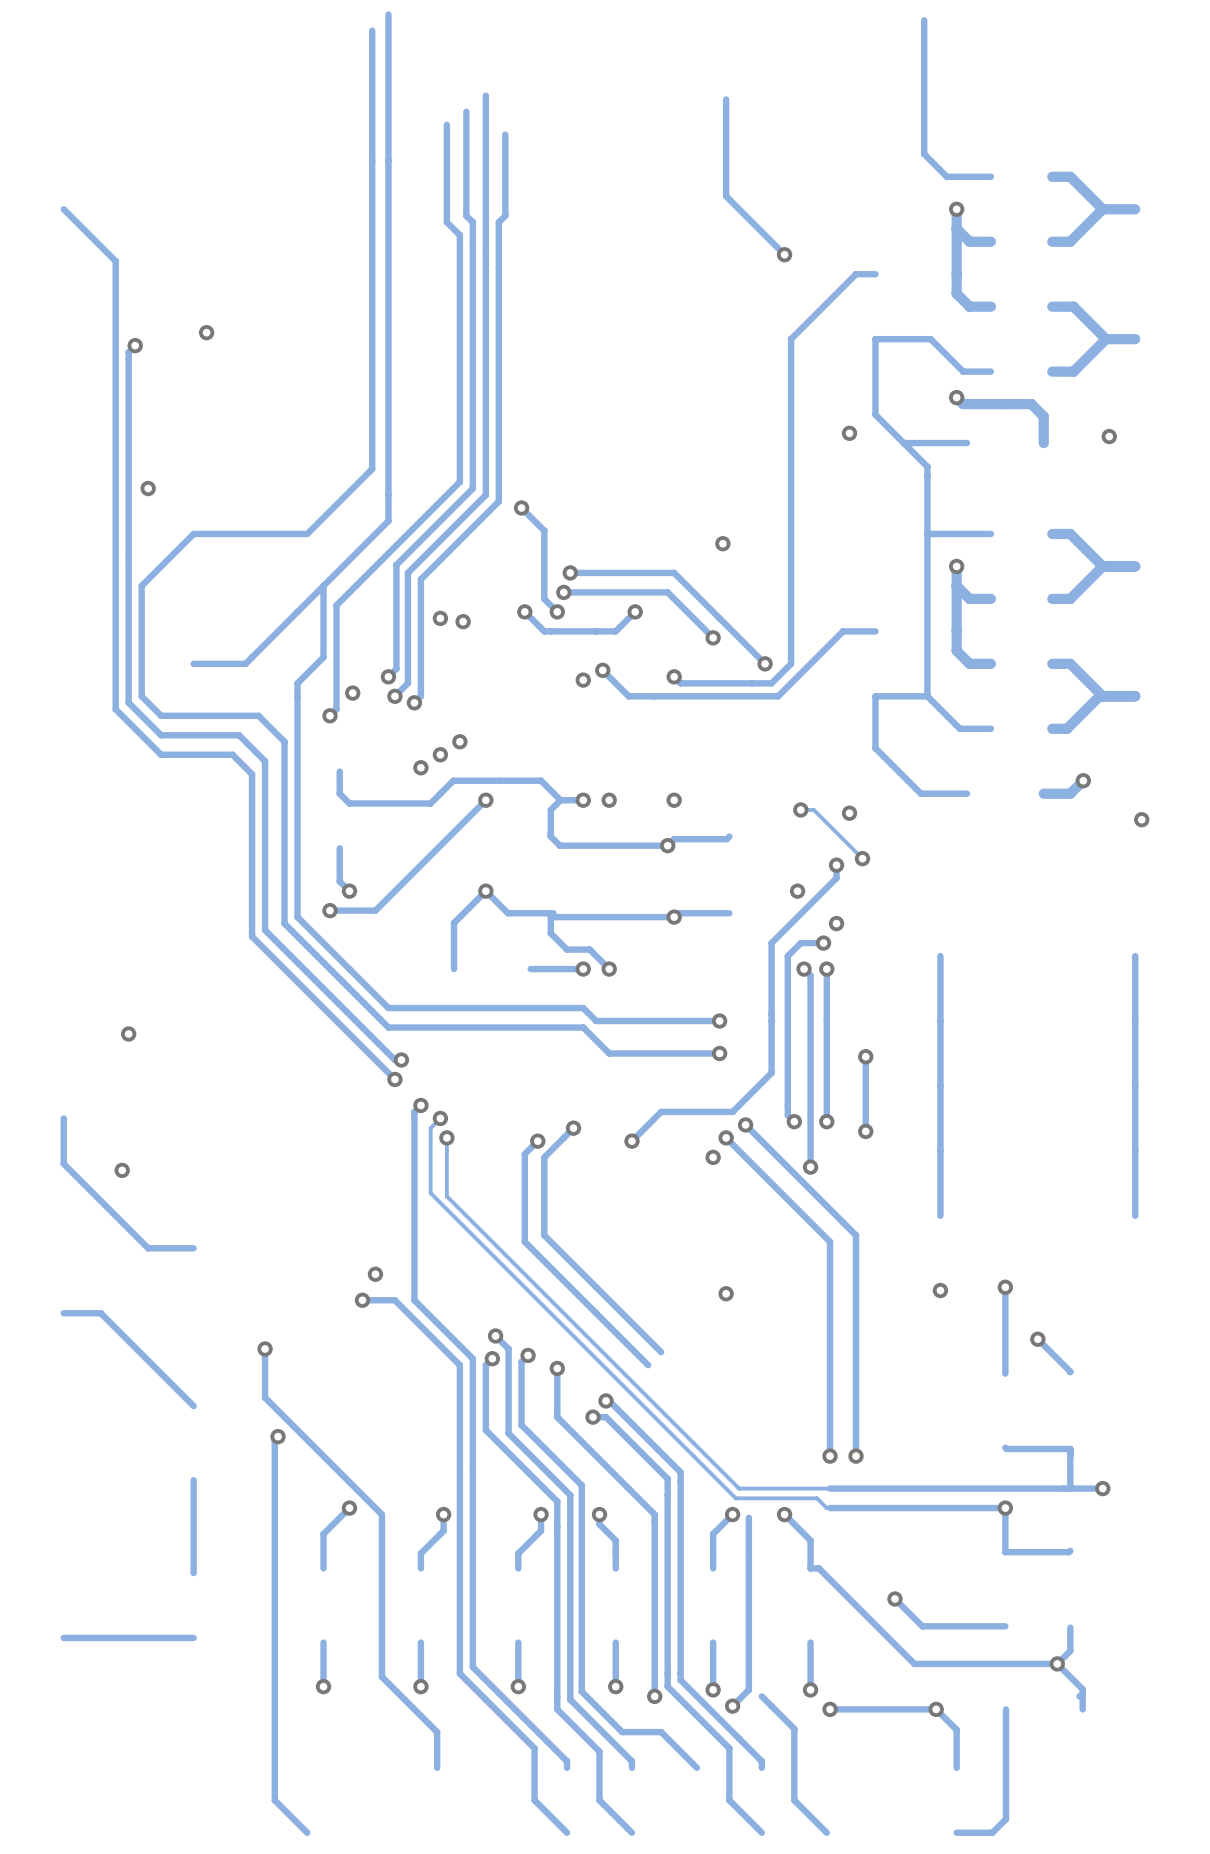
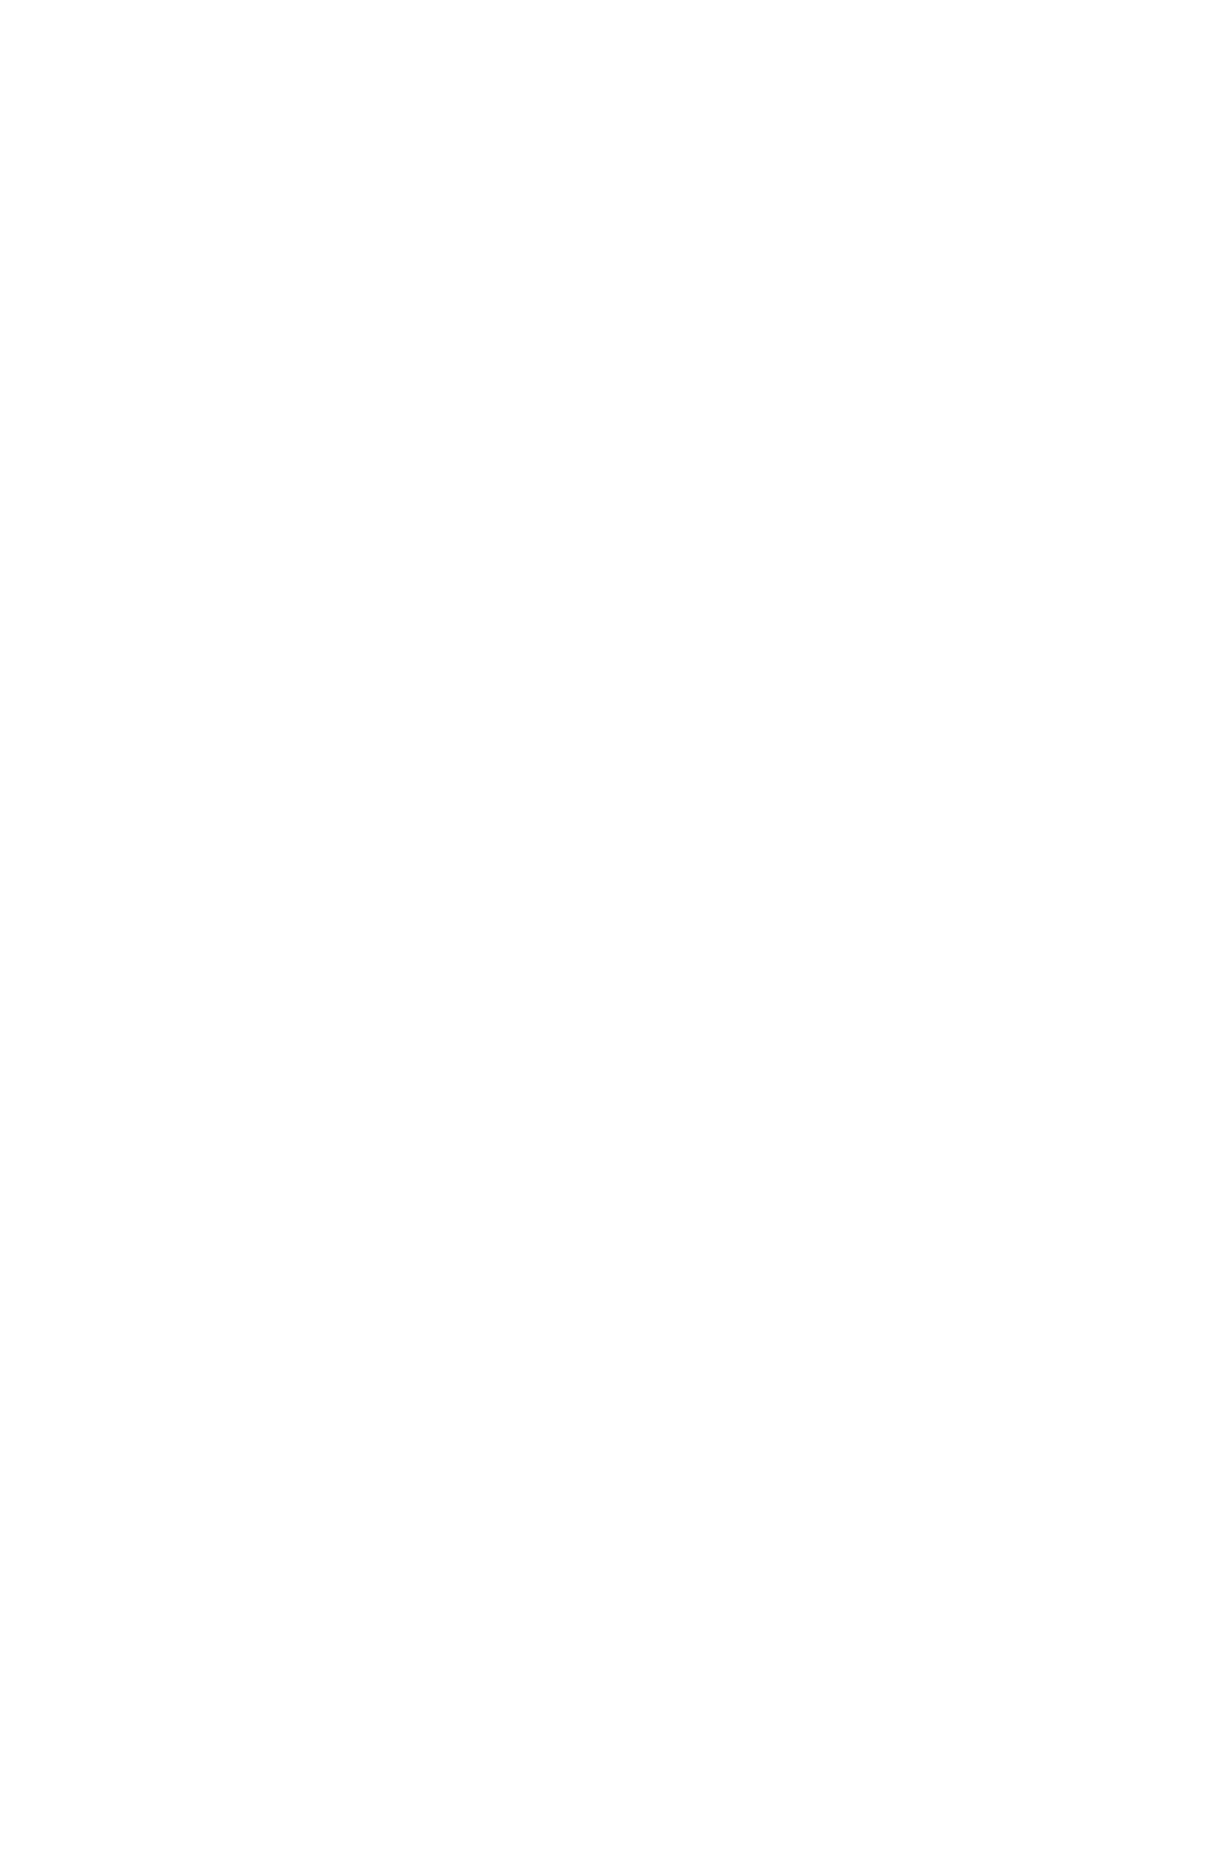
track: (388, 14) (388, 520) (245, 663) (193, 663) -> none
track: (924, 20) (924, 154) (946, 176) (990, 176) -> none
track: (372, 30) (372, 469) (307, 533) (193, 533) (141, 585) (141, 696) (161, 715) (258, 715) (284, 741) (284, 923) (388, 1027) (583, 1027) (609, 1053) (719, 1053) -> none
track: (485, 95) (485, 495) (407, 572) (407, 683) (394, 696) -> none
track: (726, 99) (726, 196) (784, 254) -> none
track: (466, 111) (466, 215) (472, 222) (472, 488) (396, 564) (396, 668) (388, 676) -> none
track: (446, 124) (446, 222) (459, 235) (459, 482) (336, 605) (336, 709) (330, 715) -> none
track: (505, 134) (505, 215) (498, 222) (498, 501) (420, 579) (420, 696) (414, 702) -> none
track: (1052, 176) (1070, 176) (1102, 209) -> none
track: (63, 209) (115, 261) (115, 709) (161, 754) (232, 754) (252, 774) (252, 936) (394, 1079) -> none
track: (956, 209) (956, 293) (969, 306) (990, 306) -> none
via: (956, 209) -> none
track: (1102, 209) (1070, 241) (1052, 241) -> none
track: (1135, 209) (1102, 209) -> none
track: (956, 228) (969, 241) (990, 241) -> none
via: (784, 254) -> none
track: (875, 274) (856, 274) (791, 339) (791, 663) (771, 683) (680, 683) (674, 676) -> none
track: (1052, 306) (1073, 306) (1106, 339) -> none
via: (206, 332) -> none
track: (1106, 339) (1073, 371) (1052, 371) -> none
track: (1135, 339) (1106, 339) -> none
track: (135, 345) (128, 352) (128, 702) (161, 735) (239, 735) (265, 761) (265, 930) (394, 1059) (401, 1059) -> none
via: (135, 345) -> none
track: (990, 371) (963, 371) (930, 339) (875, 339) (875, 414) (927, 466) (927, 696) -> none
track: (956, 397) (963, 404) (1031, 404) (1043, 416) (1043, 443) -> none
via: (956, 397) -> none
via: (849, 433) -> none
via: (1109, 436) -> none
track: (967, 443) (903, 443) -> none
via: (148, 488) -> none
track: (521, 508) (544, 530) (544, 598) (557, 611) -> none
via: (521, 508) -> none
track: (990, 533) (927, 533) -> none
track: (1052, 533) (1070, 533) (1102, 566) -> none
via: (722, 543) -> none
track: (956, 566) (956, 650) (969, 663) (990, 663) -> none
via: (956, 566) -> none
track: (1102, 566) (1070, 598) (1052, 598) -> none
track: (1135, 566) (1102, 566) -> none
track: (570, 572) (674, 572) (765, 663) -> none
via: (570, 572) -> none
track: (323, 585) (323, 657) (297, 683) (297, 917) (388, 1008) (583, 1008) (596, 1021) (719, 1021) -> none
track: (956, 585) (969, 598) (990, 598) -> none
track: (563, 592) (667, 592) (713, 637) -> none
via: (563, 592) -> none
via: (524, 611) -> none
via: (557, 611) -> none
track: (635, 611) (615, 631) (544, 631) (524, 611) -> none
via: (635, 611) -> none
via: (440, 618) -> none
via: (463, 621) -> none
track: (875, 631) (843, 631) (778, 696) (628, 696) (602, 670) -> none
via: (713, 637) -> none
via: (765, 663) -> none
track: (1052, 663) (1070, 663) (1102, 696) -> none
via: (602, 670) -> none
via: (388, 676) -> none
via: (674, 676) -> none
via: (583, 680) -> none
via: (352, 693) -> none
via: (394, 696) -> none
track: (927, 696) (875, 696) (875, 748) (920, 793) (967, 793) -> none
track: (927, 696) (959, 728) (990, 728) -> none
track: (1135, 696) (1099, 696) (1067, 728) (1052, 728) -> none
via: (414, 702) -> none
via: (330, 715) -> none
via: (459, 741) -> none
via: (440, 754) -> none
via: (420, 767) -> none
track: (339, 771) (339, 793) (349, 803) (430, 803) (453, 780) (541, 780) (560, 800) -> none
track: (1083, 780) (1070, 793) (1043, 793) -> none
via: (1083, 780) -> none
track: (485, 800) (375, 910) (330, 910) -> none
via: (485, 800) -> none
track: (560, 800) (550, 809) (550, 836) (559, 845) (667, 845) (674, 839) (726, 839) (729, 836) -> none
track: (583, 800) (560, 800) -> none
via: (583, 800) -> none
via: (609, 800) -> none
via: (674, 800) -> none
track: (800, 809) (813, 809) (862, 858) -> none
via: (800, 809) -> none
via: (849, 813) -> none
via: (1141, 819) -> none
via: (667, 845) -> none
track: (339, 848) (339, 881) (349, 891) -> none
via: (862, 858) -> none
track: (836, 865) (836, 878) (771, 943) (771, 1072) (732, 1111) (661, 1111) (631, 1141) -> none
via: (836, 865) -> none
via: (349, 891) -> none
via: (485, 891) -> none
via: (797, 891) -> none
via: (330, 910) -> none
track: (553, 913) (507, 913) (485, 891) (454, 923) (454, 969) -> none
track: (729, 913) (678, 913) (674, 917) (554, 917) (550, 913) (550, 933) (567, 949) (589, 949) (609, 969) -> none
via: (674, 917) -> none
via: (836, 923) -> none
track: (823, 943) (800, 943) (787, 956) (787, 1115) (794, 1121) -> none
via: (823, 943) -> none
track: (940, 956) (940, 1215) -> none
track: (1135, 956) (1135, 1215) -> none
track: (583, 969) (530, 969) -> none
via: (583, 969) -> none
via: (609, 969) -> none
track: (804, 969) (810, 975) (810, 1167) -> none
via: (804, 969) -> none
track: (826, 969) (826, 1121) -> none
via: (826, 969) -> none
via: (719, 1021) -> none
via: (128, 1034) -> none
via: (719, 1053) -> none
track: (865, 1056) (865, 1131) -> none
via: (865, 1056) -> none
via: (401, 1059) -> none
via: (394, 1079) -> none
track: (420, 1105) (414, 1111) (414, 1300) (472, 1358) (472, 1667) (567, 1761) (567, 1767) -> none
via: (420, 1105) -> none
track: (63, 1118) (63, 1163) (148, 1248) (193, 1248) -> none
track: (440, 1118) (430, 1128) (430, 1193) (735, 1498) (817, 1498) (826, 1508) (1005, 1508) (1005, 1552) (1070, 1550) -> none
via: (440, 1118) -> none
via: (794, 1121) -> none
via: (826, 1121) -> none
track: (745, 1124) (856, 1235) (856, 1456) -> none
via: (745, 1124) -> none
track: (573, 1128) (544, 1157) (544, 1235) (661, 1352) -> none
via: (573, 1128) -> none
via: (865, 1131) -> none
track: (446, 1137) (446, 1196) (739, 1488) (1102, 1488) -> none
via: (446, 1137) -> none
track: (726, 1137) (830, 1241) (830, 1456) -> none
via: (726, 1137) -> none
track: (537, 1141) (524, 1154) (524, 1241) (648, 1365) -> none
via: (537, 1141) -> none
via: (631, 1141) -> none
via: (713, 1157) -> none
via: (810, 1167) -> none
via: (122, 1170) -> none
via: (375, 1274) -> none
track: (1005, 1287) (1005, 1373) -> none
via: (1005, 1287) -> none
via: (940, 1290) -> none
via: (726, 1293) -> none
track: (362, 1300) (394, 1300) (459, 1365) (459, 1673) (534, 1748) (534, 1800) (567, 1832) -> none
via: (362, 1300) -> none
track: (63, 1313) (100, 1313) (193, 1406) -> none
track: (495, 1335) (508, 1348) (508, 1433) (570, 1495) (570, 1699) (631, 1761) (631, 1767) -> none
via: (495, 1335) -> none
track: (1037, 1339) (1070, 1372) -> none
via: (1037, 1339) -> none
track: (265, 1348) (265, 1397) (381, 1514) (381, 1676) (437, 1732) (437, 1767) -> none
via: (265, 1348) -> none
track: (528, 1355) (521, 1361) (521, 1425) (581, 1485) (581, 1691) (622, 1732) (661, 1732) (696, 1767) -> none
via: (528, 1355) -> none
track: (492, 1358) (485, 1365) (485, 1430) (557, 1501) (557, 1709) (599, 1751) (599, 1800) (631, 1832) -> none
via: (492, 1358) -> none
track: (557, 1368) (557, 1417) (654, 1514) (654, 1696) -> none
via: (557, 1368) -> none
track: (605, 1400) (609, 1400) (680, 1472) (680, 1680) (761, 1761) (761, 1767) -> none
via: (605, 1400) -> none
track: (593, 1417) (605, 1417) (667, 1478) (667, 1686) (729, 1748) (729, 1800) (761, 1832) -> none
via: (593, 1417) -> none
track: (278, 1436) (274, 1439) (274, 1800) (307, 1832) -> none
via: (278, 1436) -> none
track: (1005, 1447) (1070, 1449) (1070, 1488) -> none
via: (830, 1456) -> none
via: (856, 1456) -> none
track: (193, 1480) (193, 1573) -> none
via: (1102, 1488) -> none
track: (349, 1508) (323, 1534) (323, 1568) -> none
via: (349, 1508) -> none
via: (1005, 1508) -> none
track: (443, 1514) (443, 1530) (420, 1553) (420, 1568) -> none
via: (443, 1514) -> none
track: (541, 1514) (541, 1530) (518, 1553) (518, 1568) -> none
via: (541, 1514) -> none
track: (599, 1514) (599, 1524) (615, 1540) (615, 1568) -> none
via: (599, 1514) -> none
track: (732, 1514) (713, 1534) (713, 1568) -> none
via: (732, 1514) -> none
track: (784, 1514) (810, 1540) (810, 1568) (818, 1568) (914, 1663) (1057, 1663) -> none
via: (784, 1514) -> none
track: (748, 1517) (748, 1689) (732, 1706) -> none
track: (894, 1598) (922, 1626) (1005, 1626) -> none
via: (894, 1598) -> none
track: (1070, 1627) (1070, 1650) (1057, 1663) -> none
track: (193, 1637) (63, 1637) -> none
track: (323, 1642) (323, 1686) -> none
track: (420, 1642) (420, 1686) -> none
track: (518, 1642) (518, 1686) -> none
track: (615, 1642) (615, 1686) -> none
track: (713, 1642) (713, 1689) -> none
track: (810, 1642) (810, 1689) -> none
track: (1057, 1663) (1082, 1689) (1082, 1709) -> none
via: (1057, 1663) -> none
via: (323, 1686) -> none
via: (420, 1686) -> none
via: (518, 1686) -> none
via: (615, 1686) -> none
via: (713, 1689) -> none
via: (810, 1689) -> none
track: (1080, 1695) (1079, 1696) -> none
via: (654, 1696) -> none
track: (761, 1696) (794, 1728) (794, 1800) (826, 1832) -> none
via: (732, 1706) -> none
via: (830, 1709) -> none
track: (936, 1709) (956, 1729) (956, 1767) -> none
via: (936, 1709) -> none
track: (937, 1709) (830, 1709) -> none
track: (1005, 1709) (1005, 1819) (992, 1832) (956, 1832) -> none

